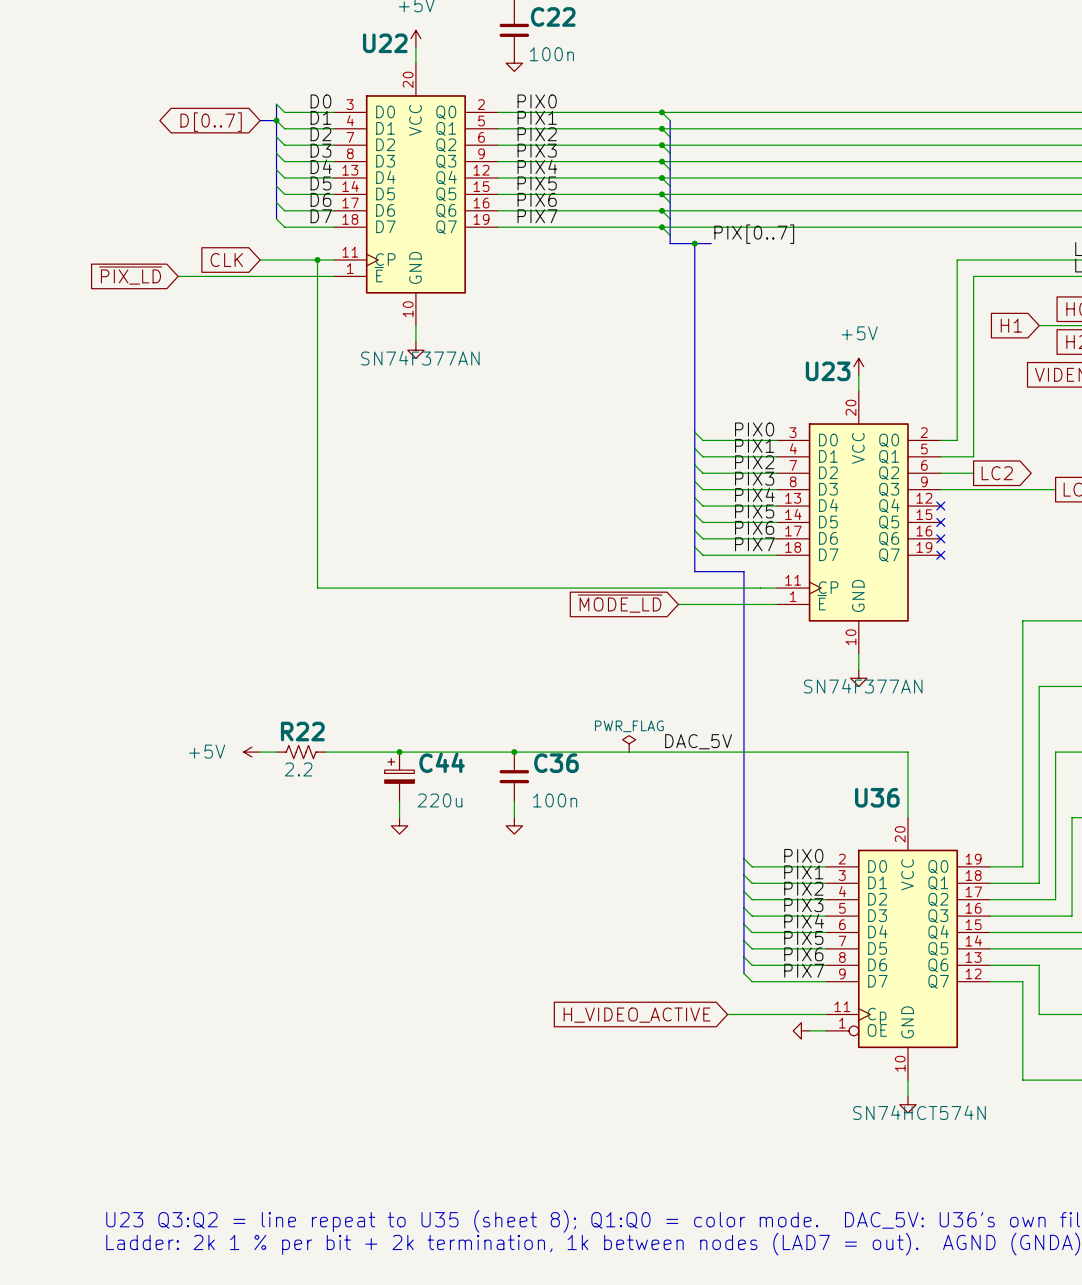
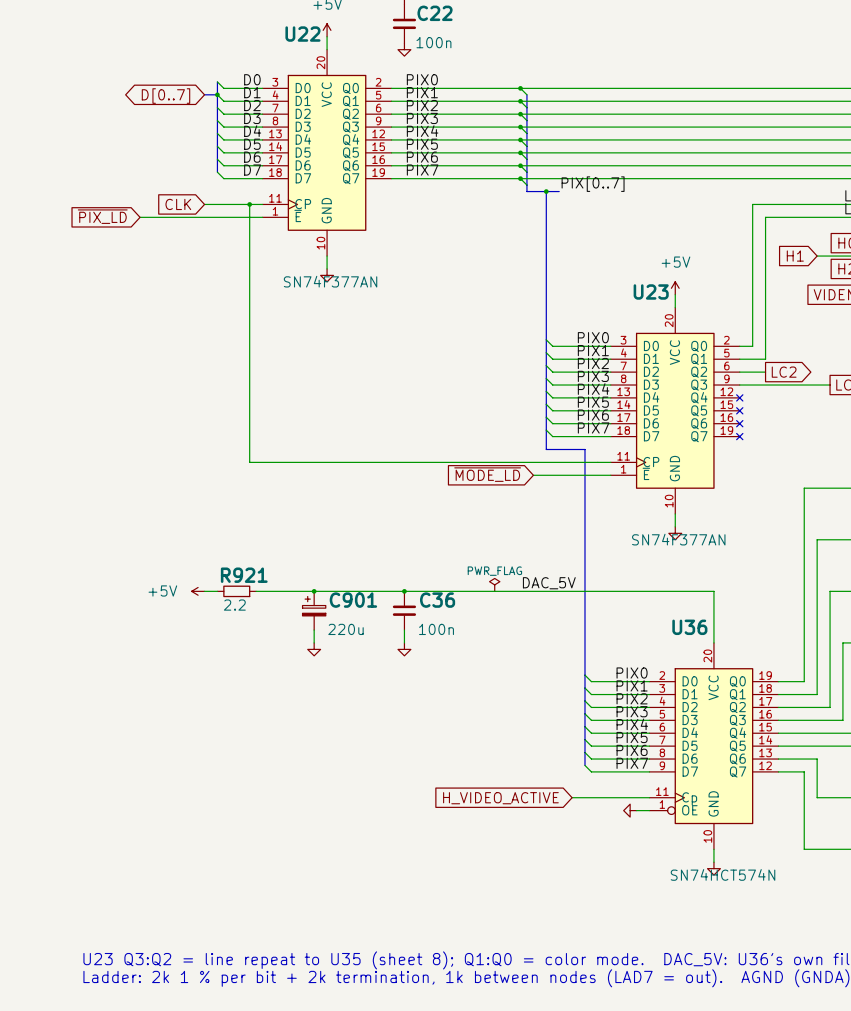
R22: 2.2 (301, 752) -> none
R921: none -> 2.2 (236, 591)
C44 name: C44 (442, 762) -> C901 (353, 600)

